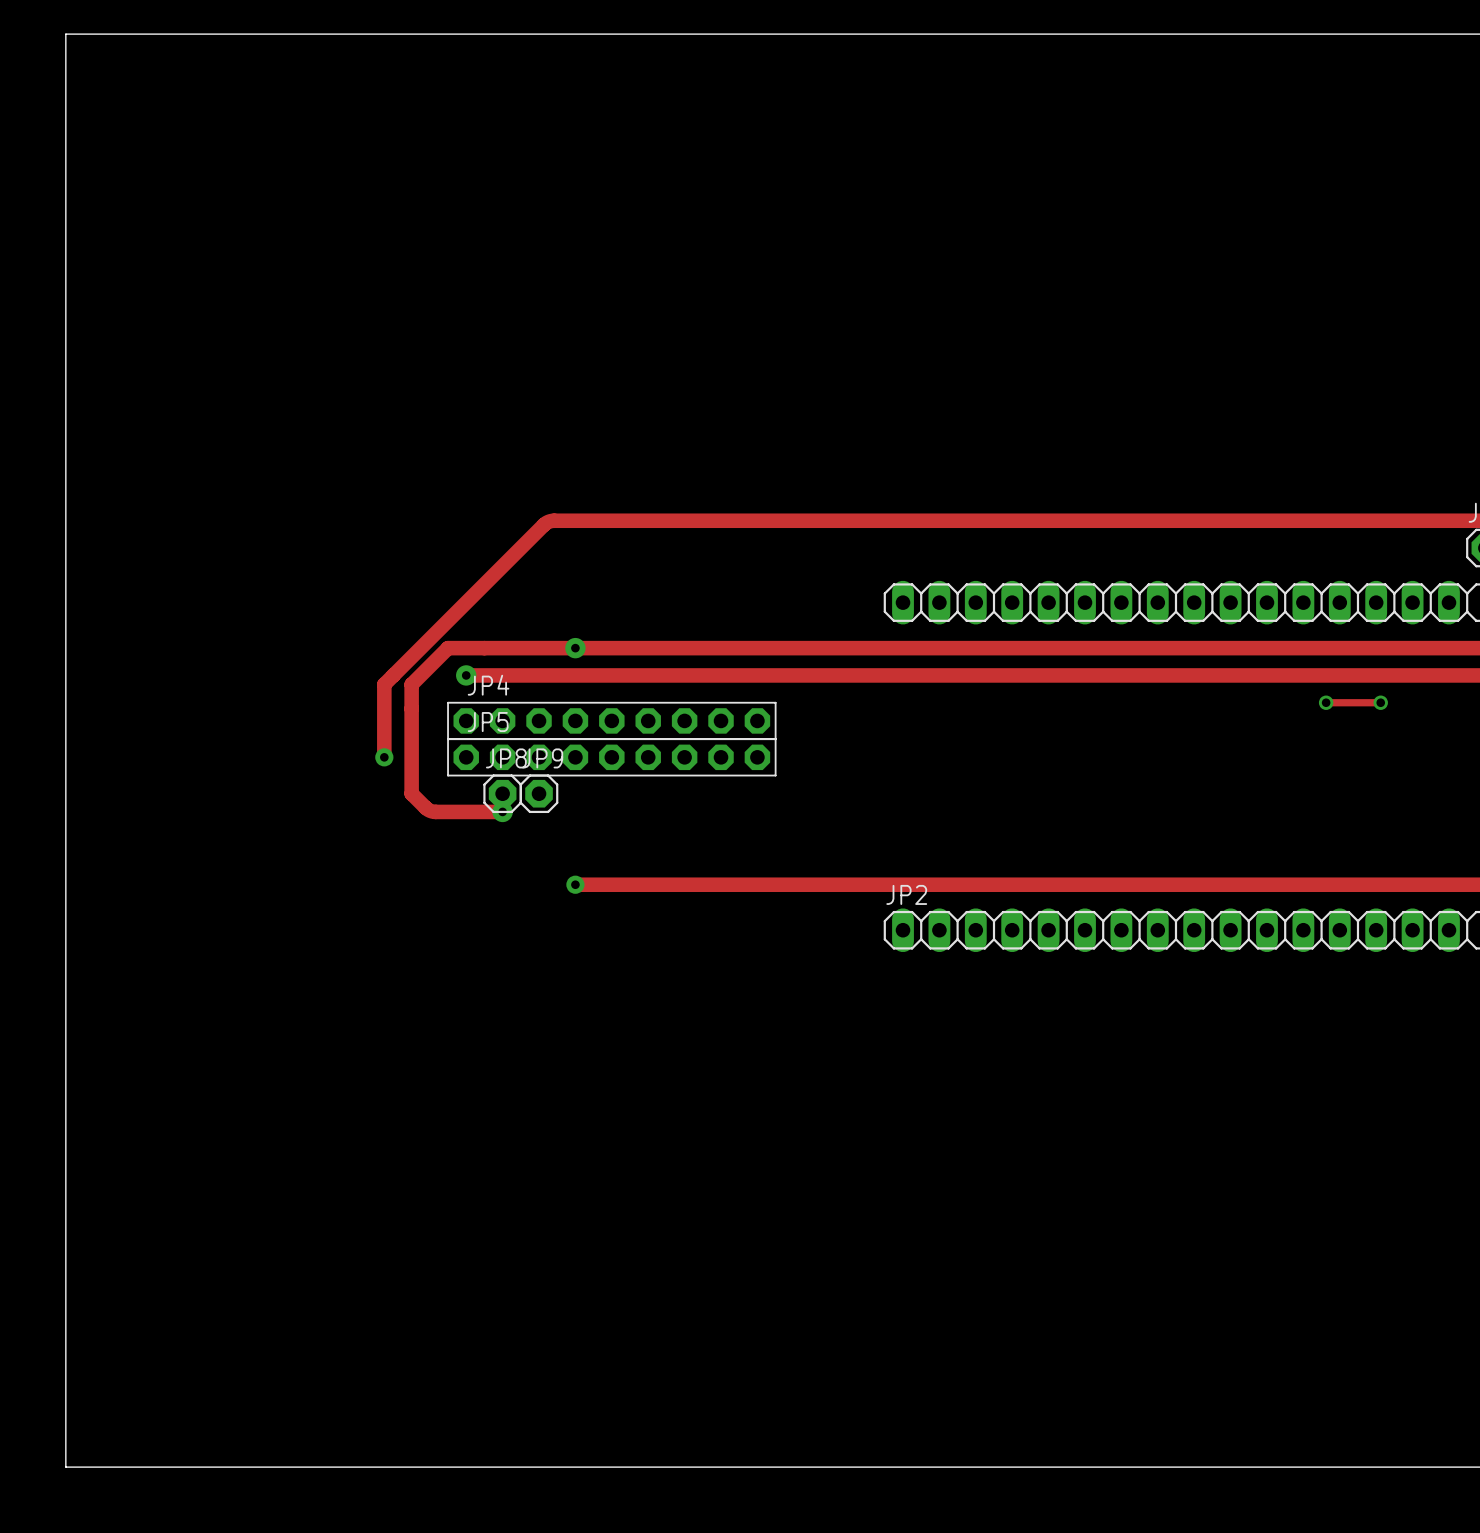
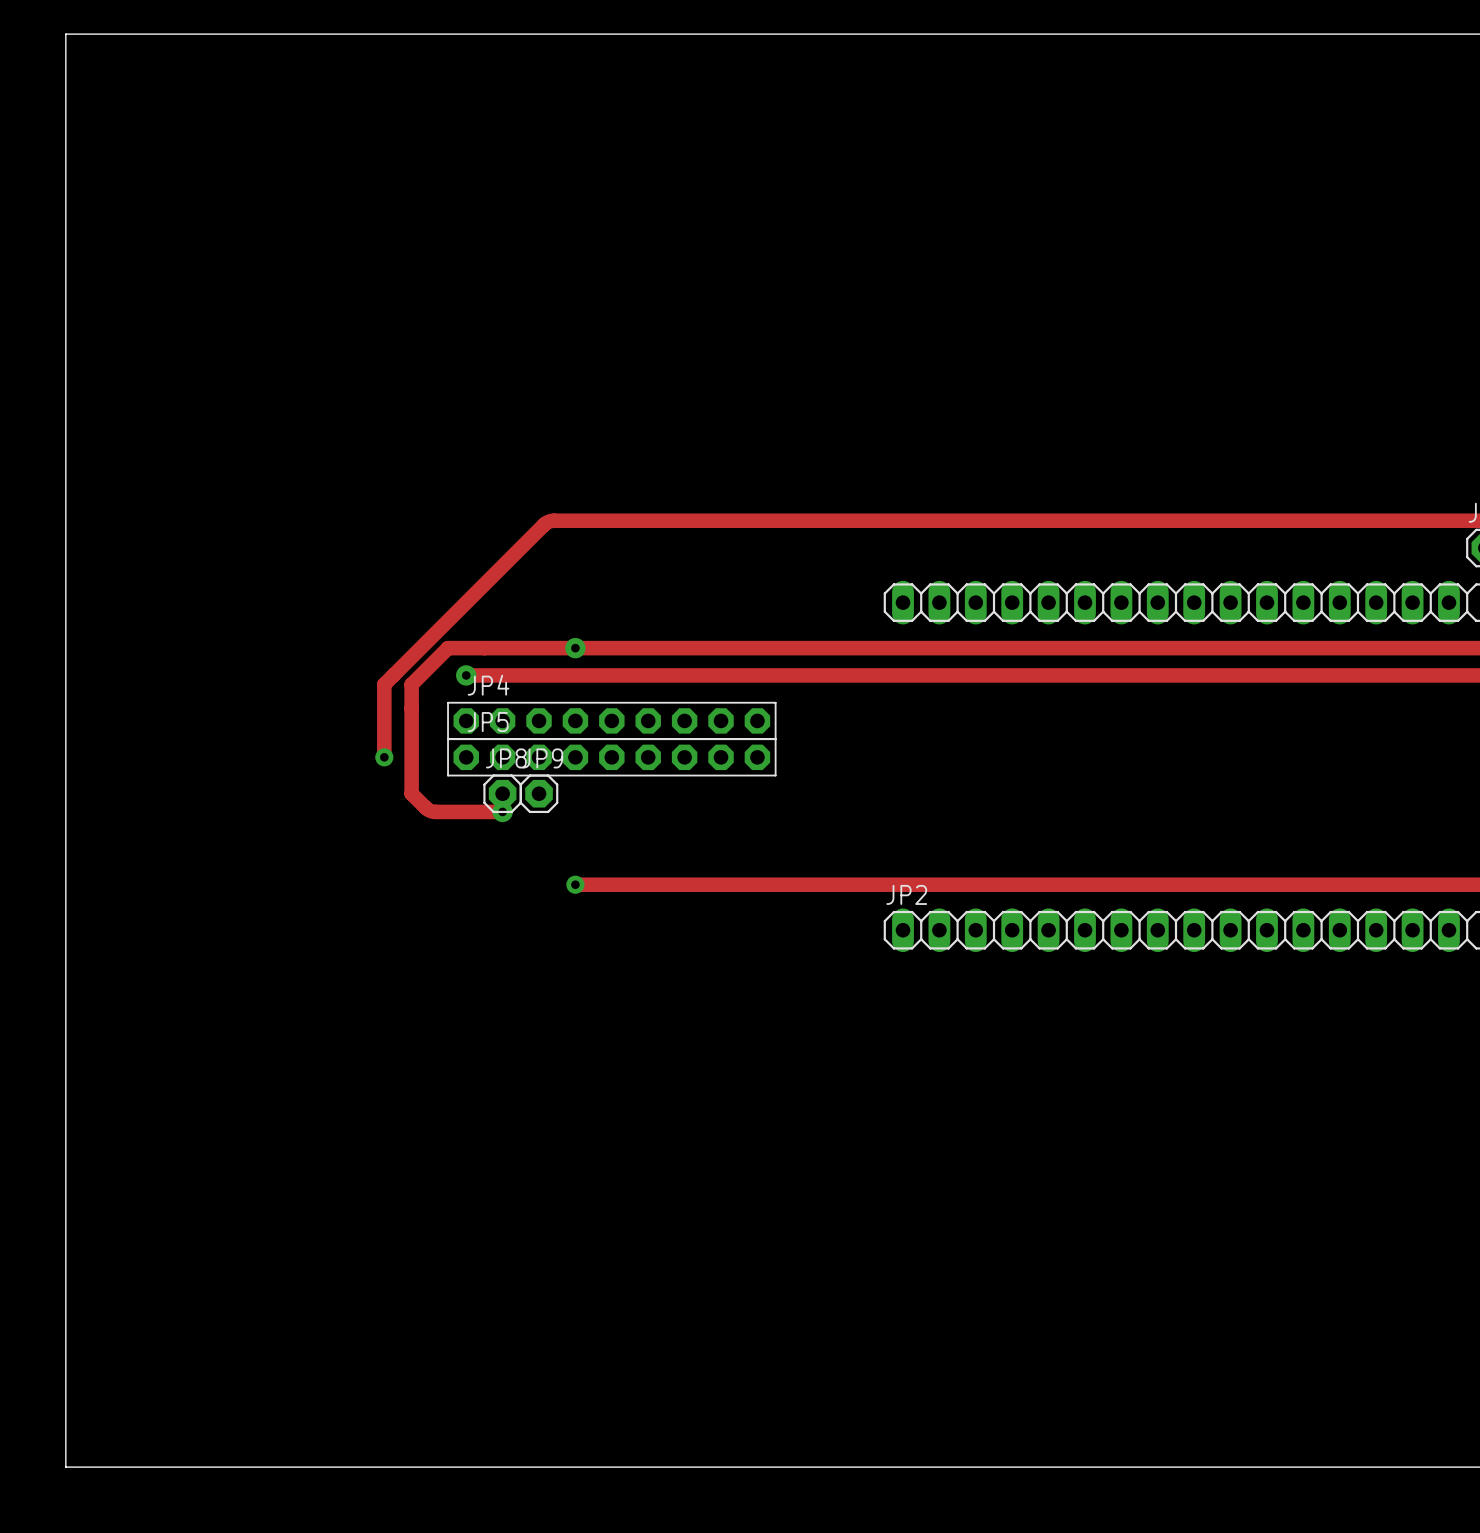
track: (1326, 702) (1380, 702) -> none
via: (1326, 702) -> none
via: (1380, 702) -> none

